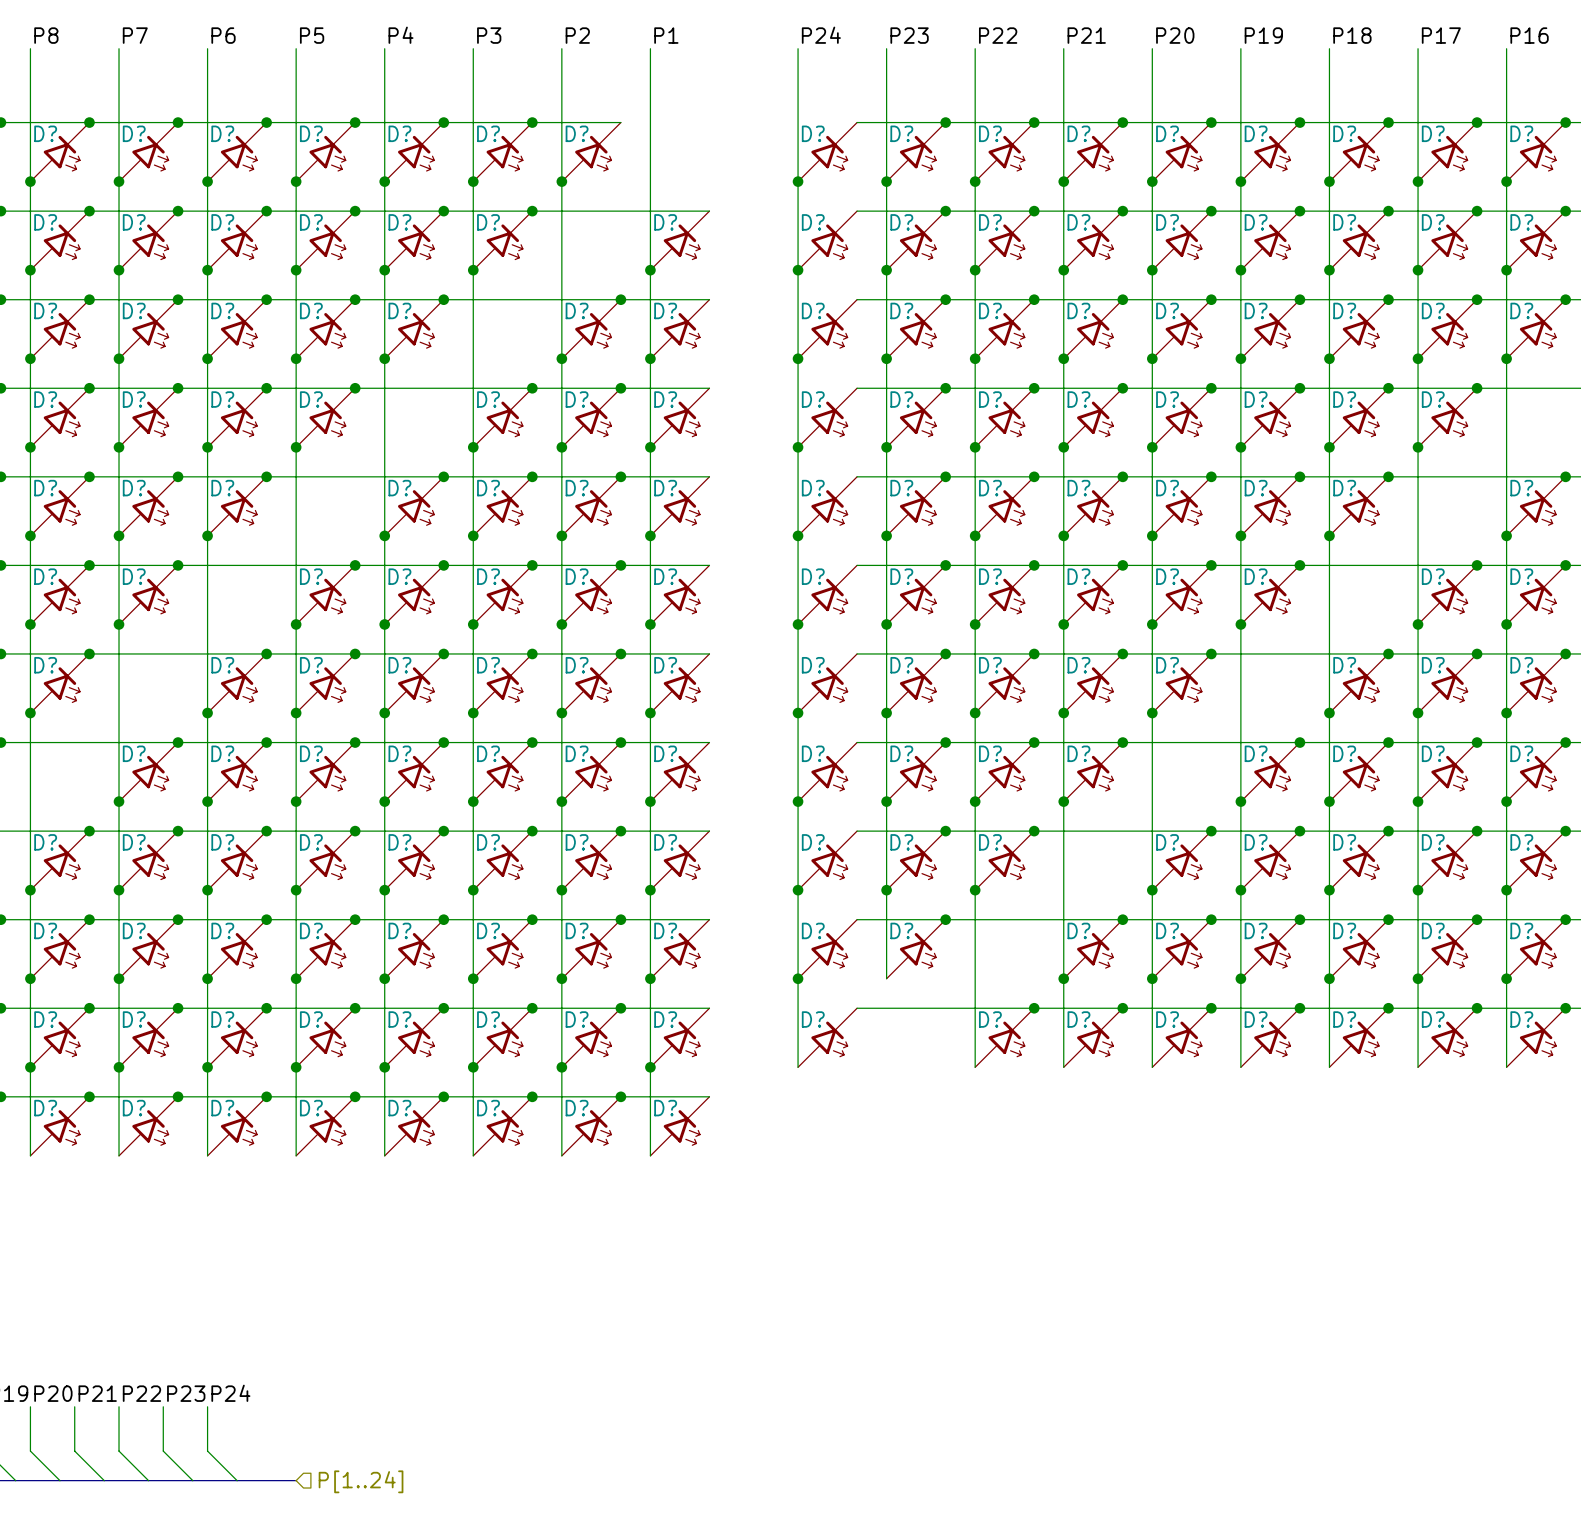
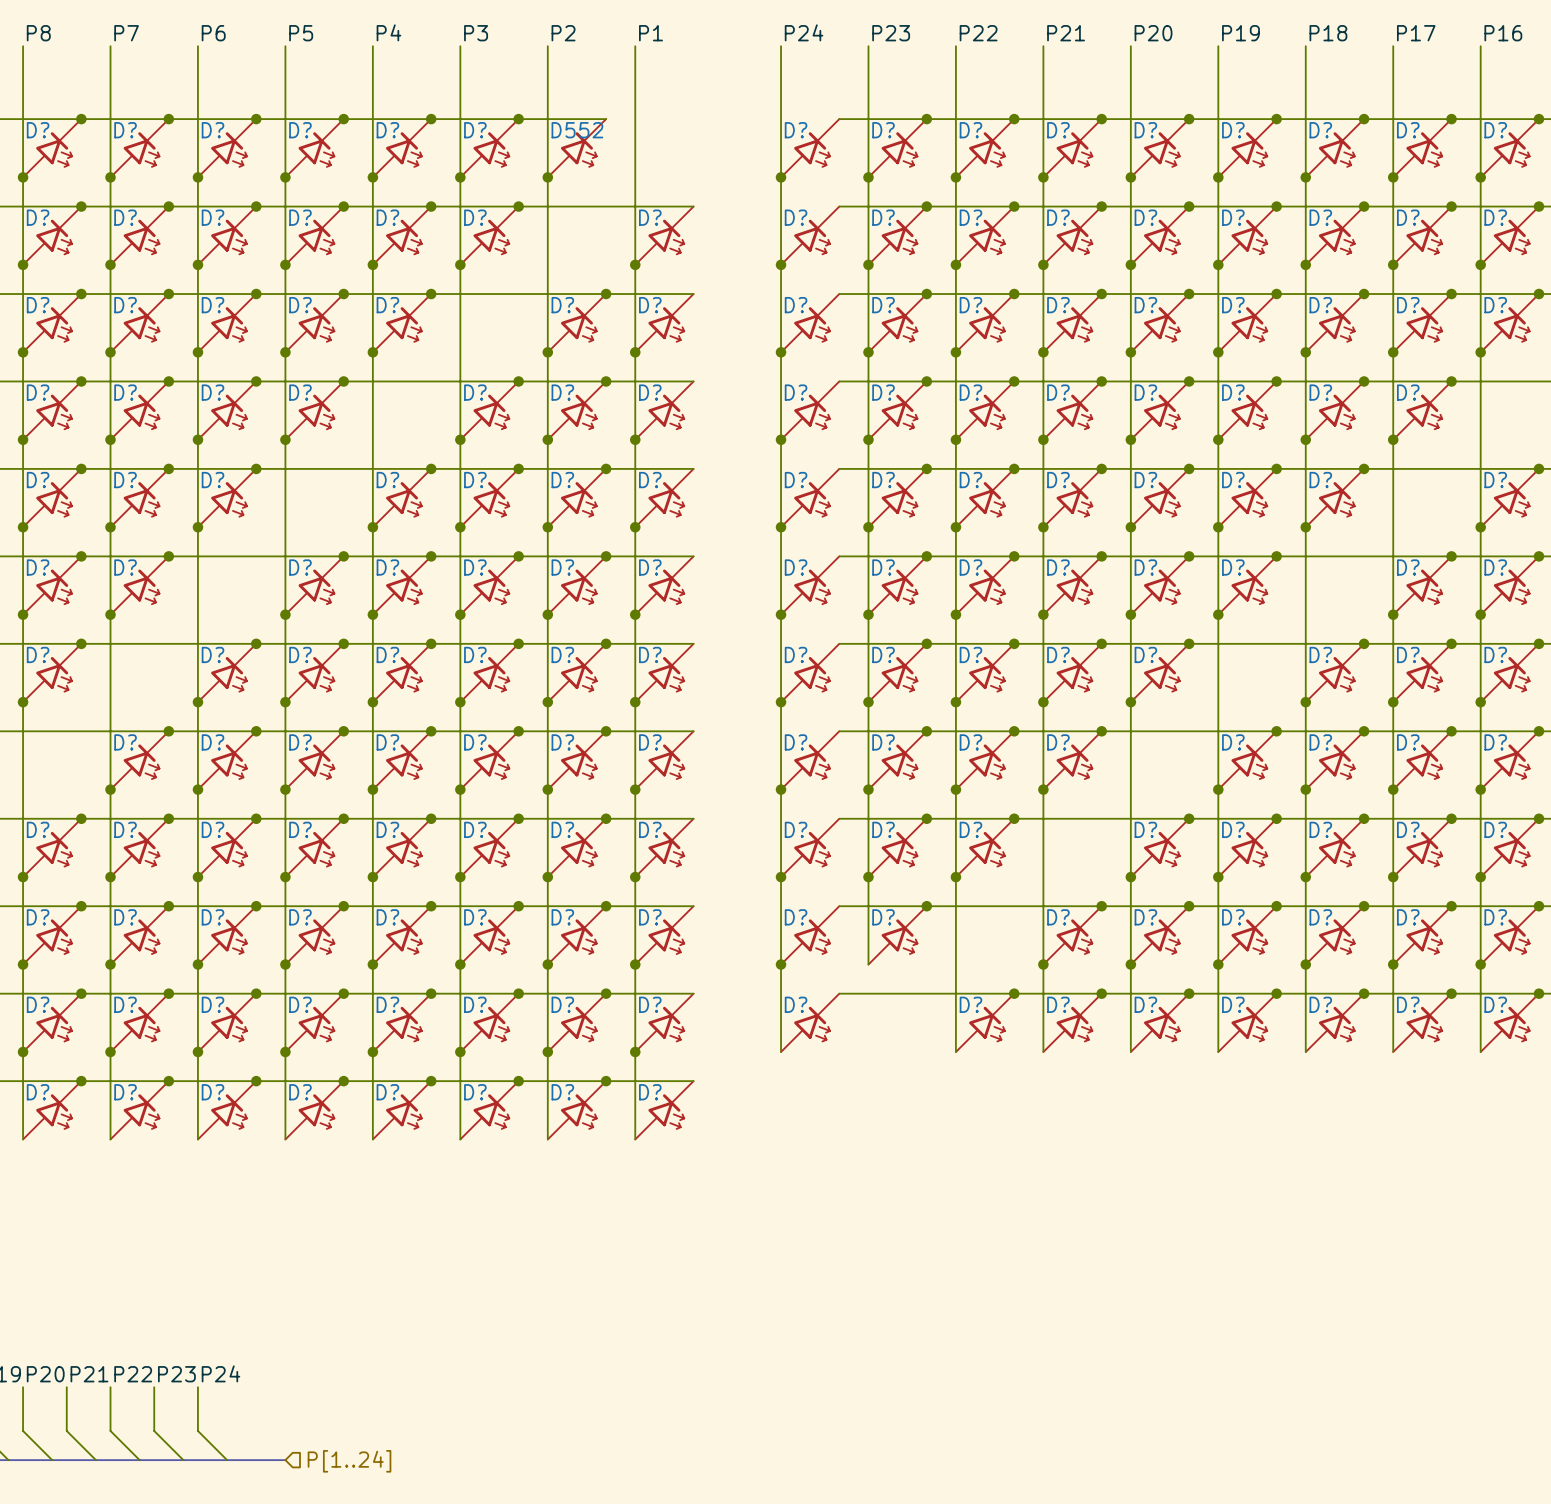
D? name: D? (577, 133) -> D552 (577, 130)

